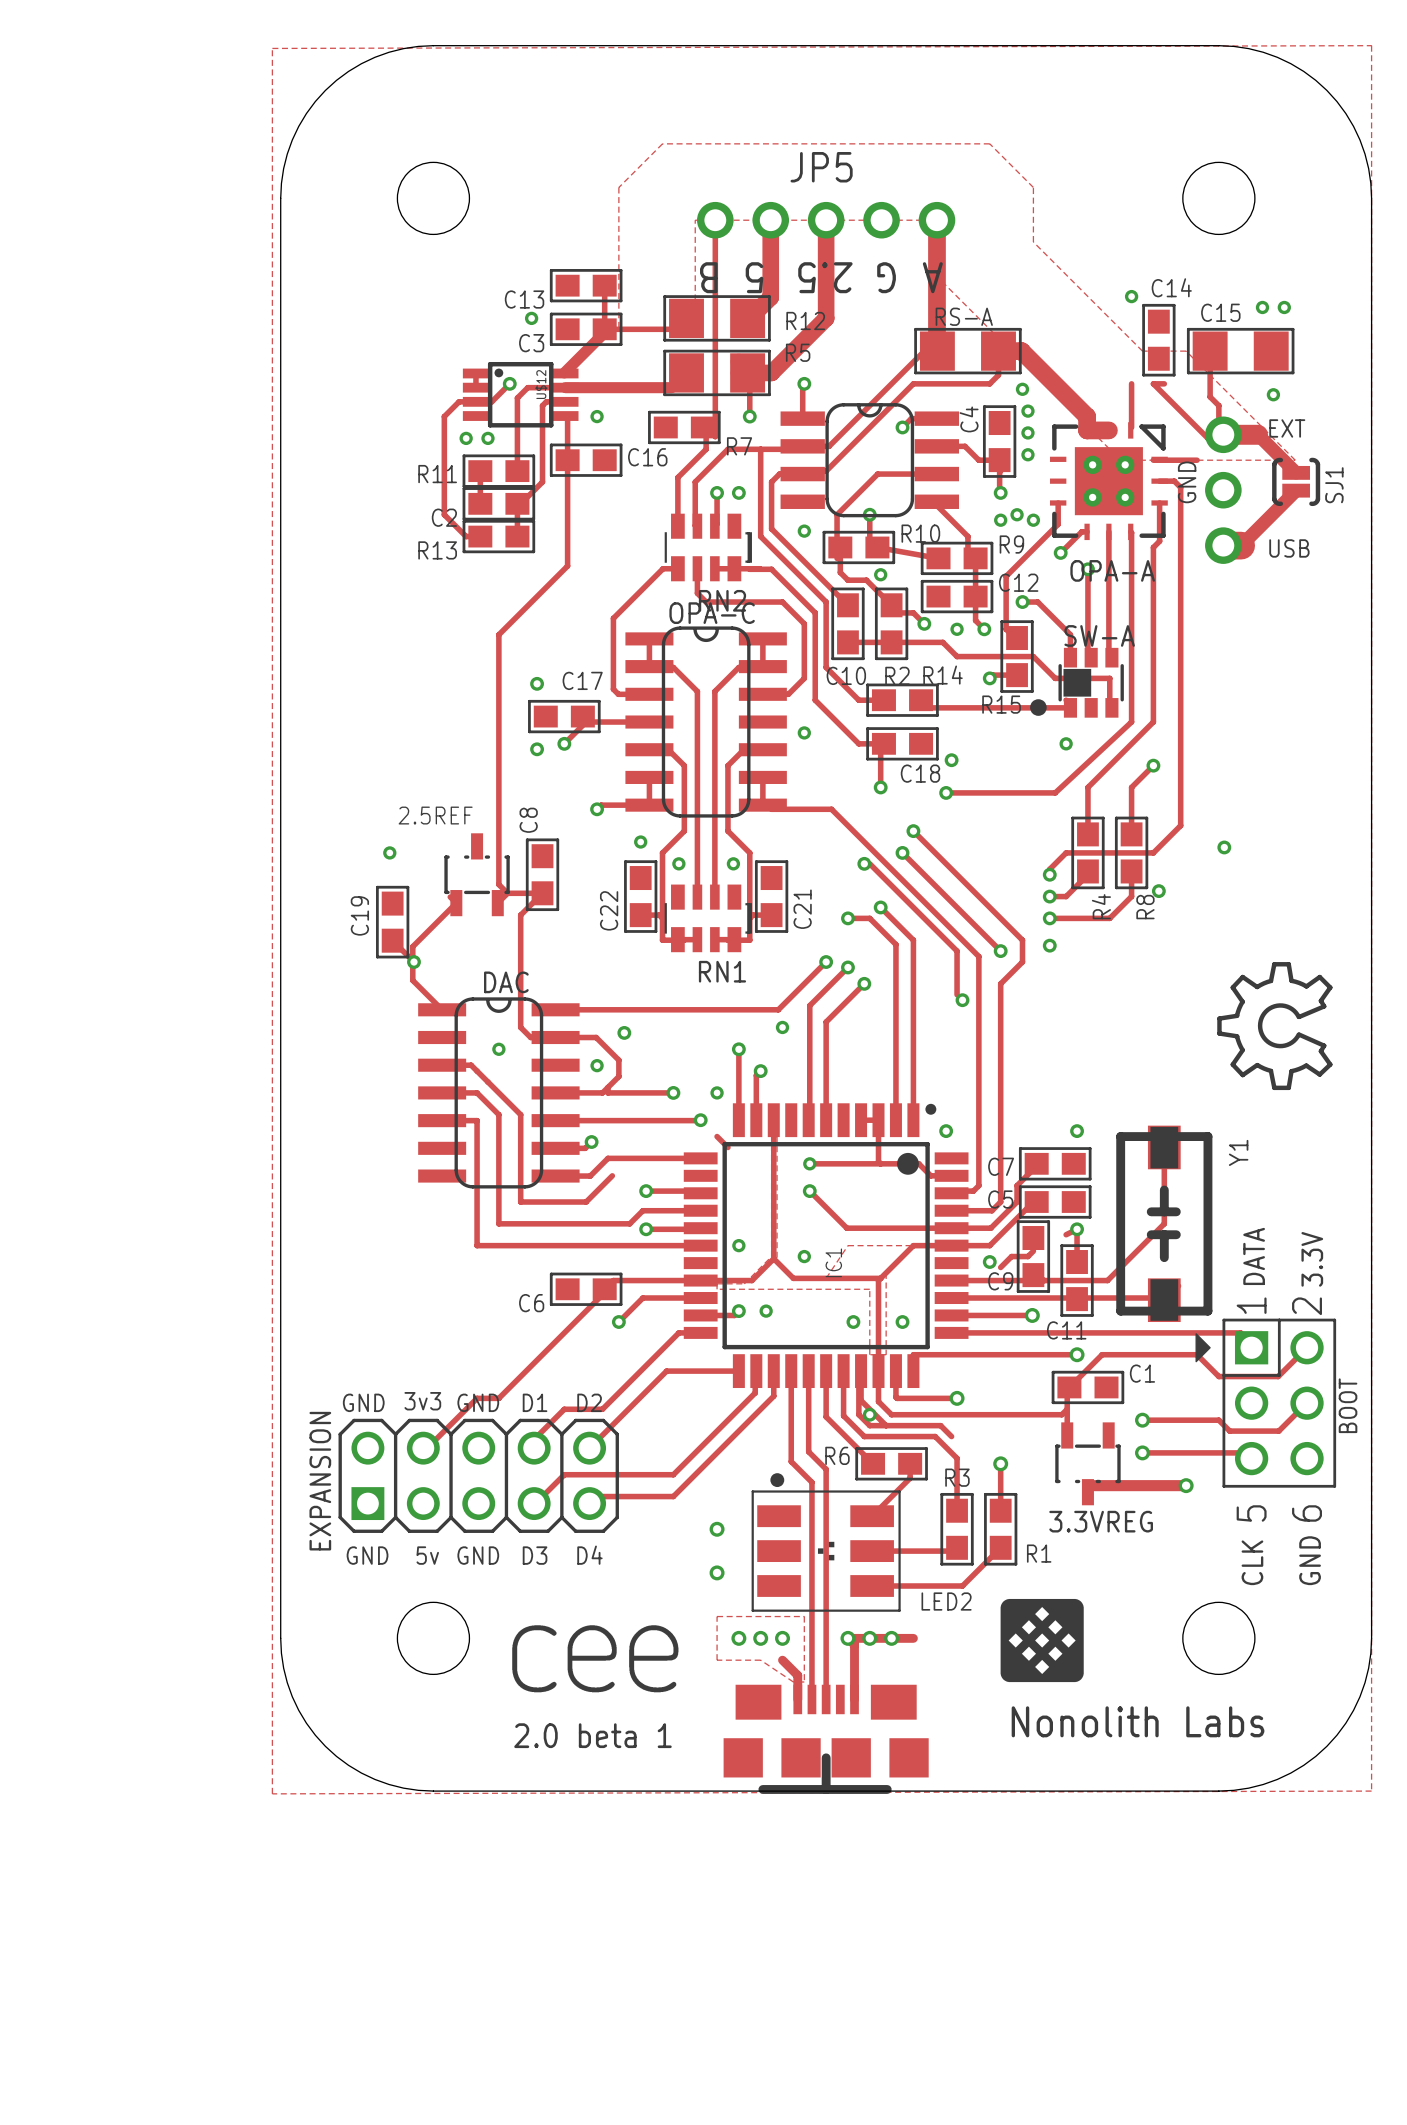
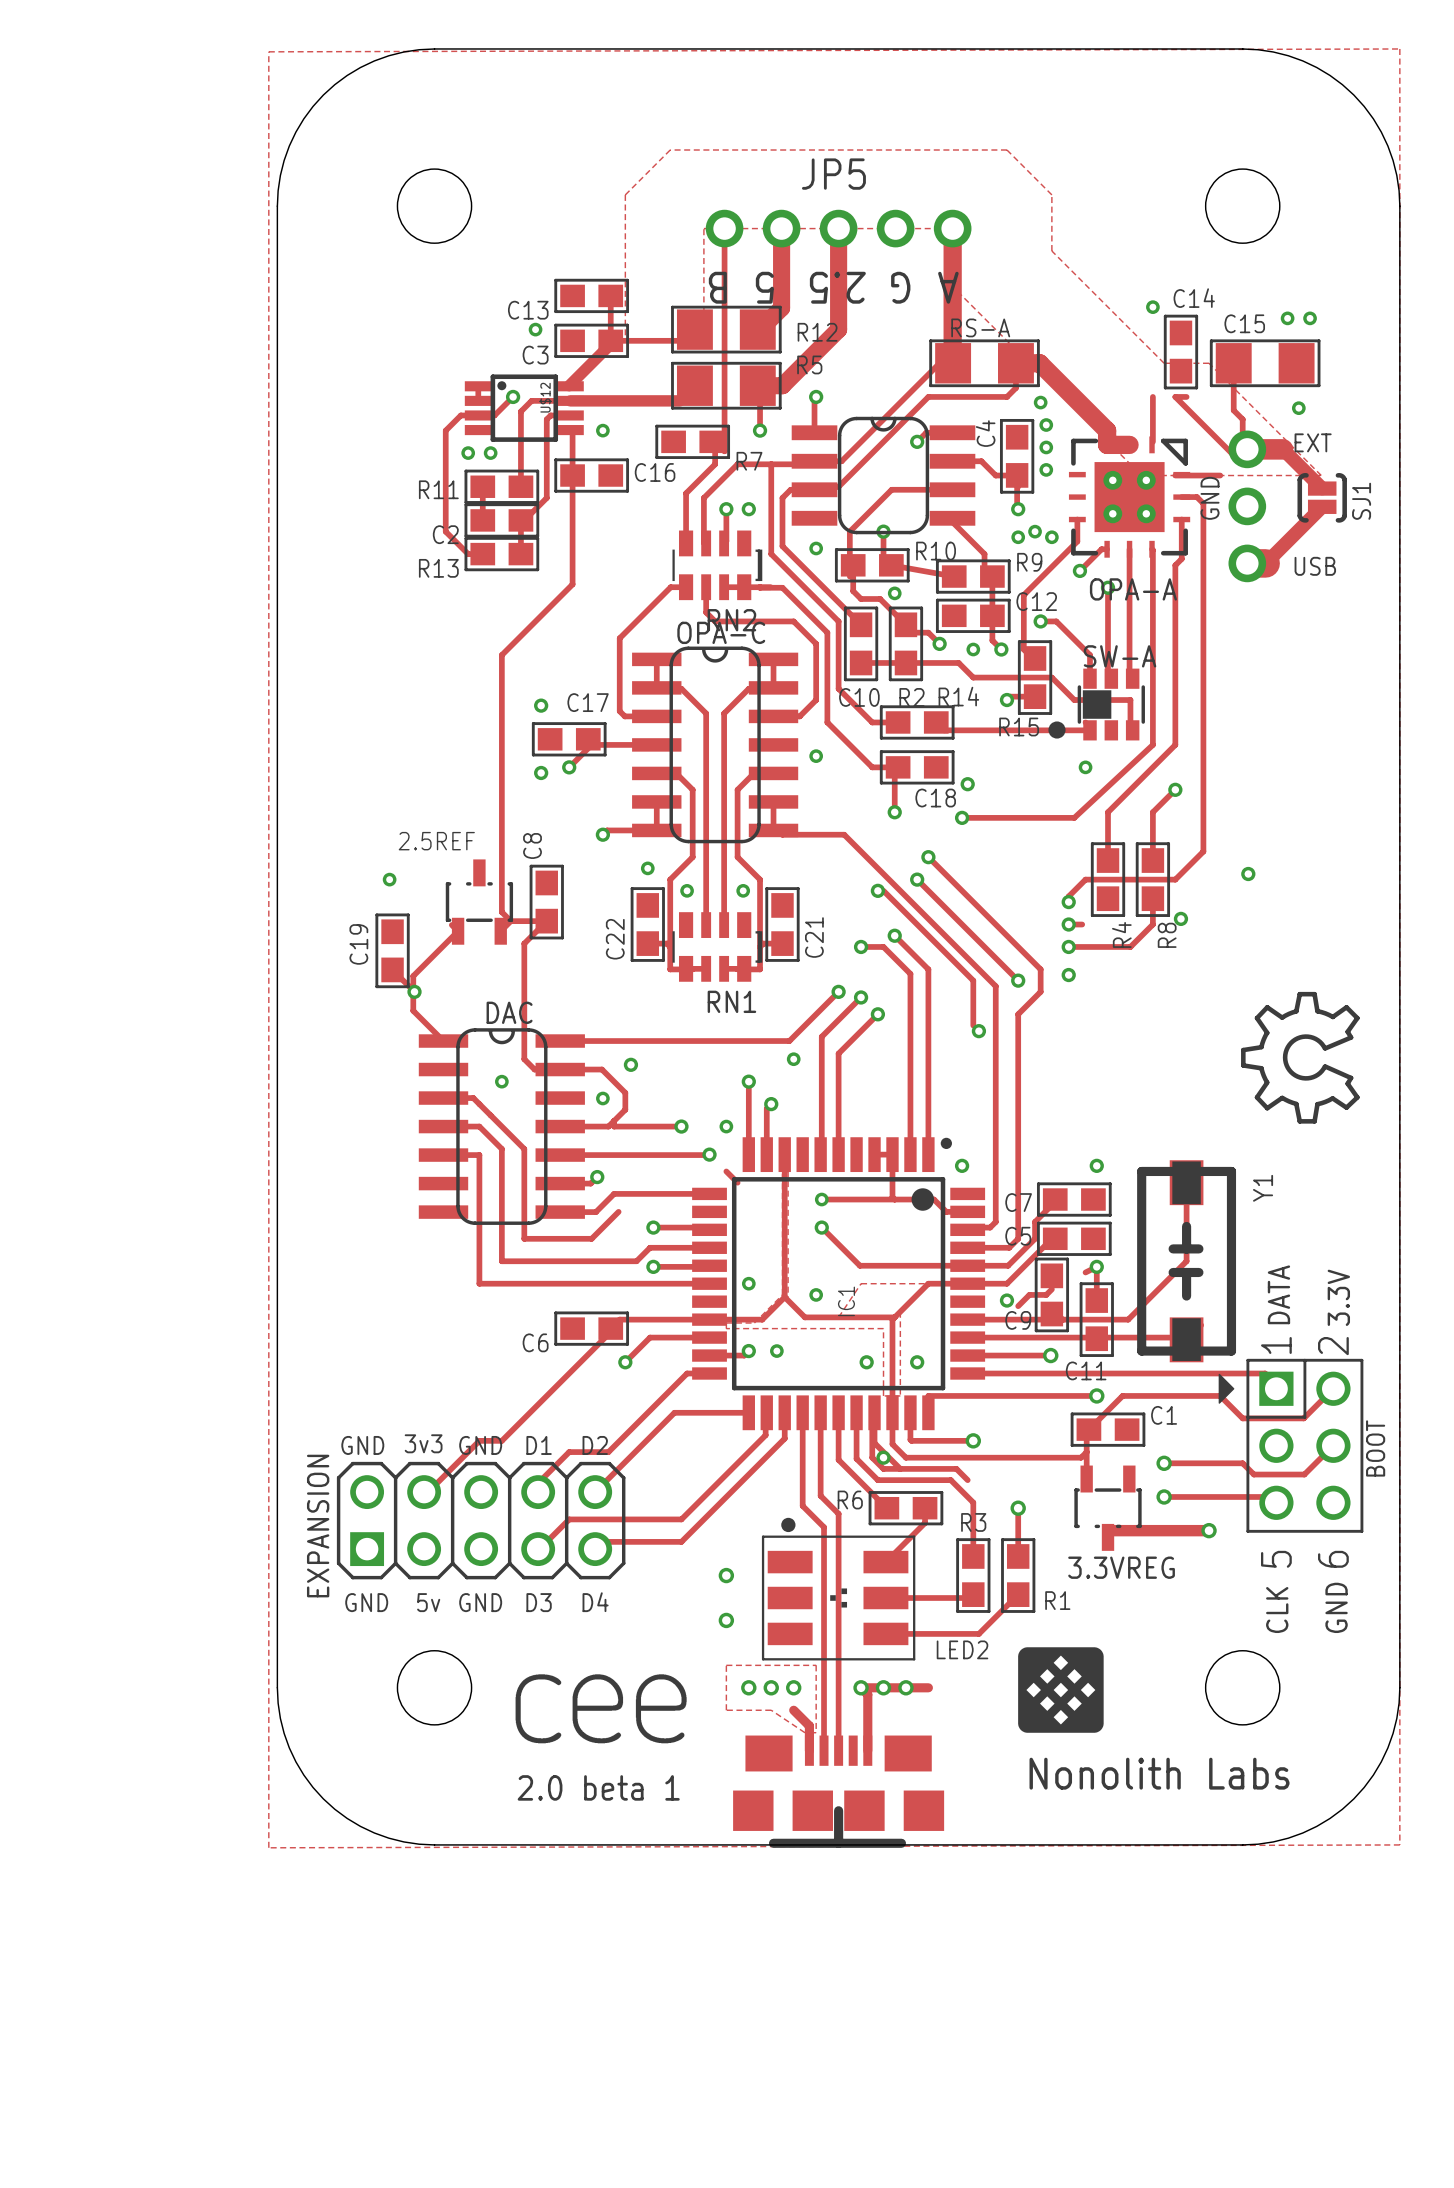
track: (1087, 871) (1087, 874) (1066, 896) (1062, 896) -> none

